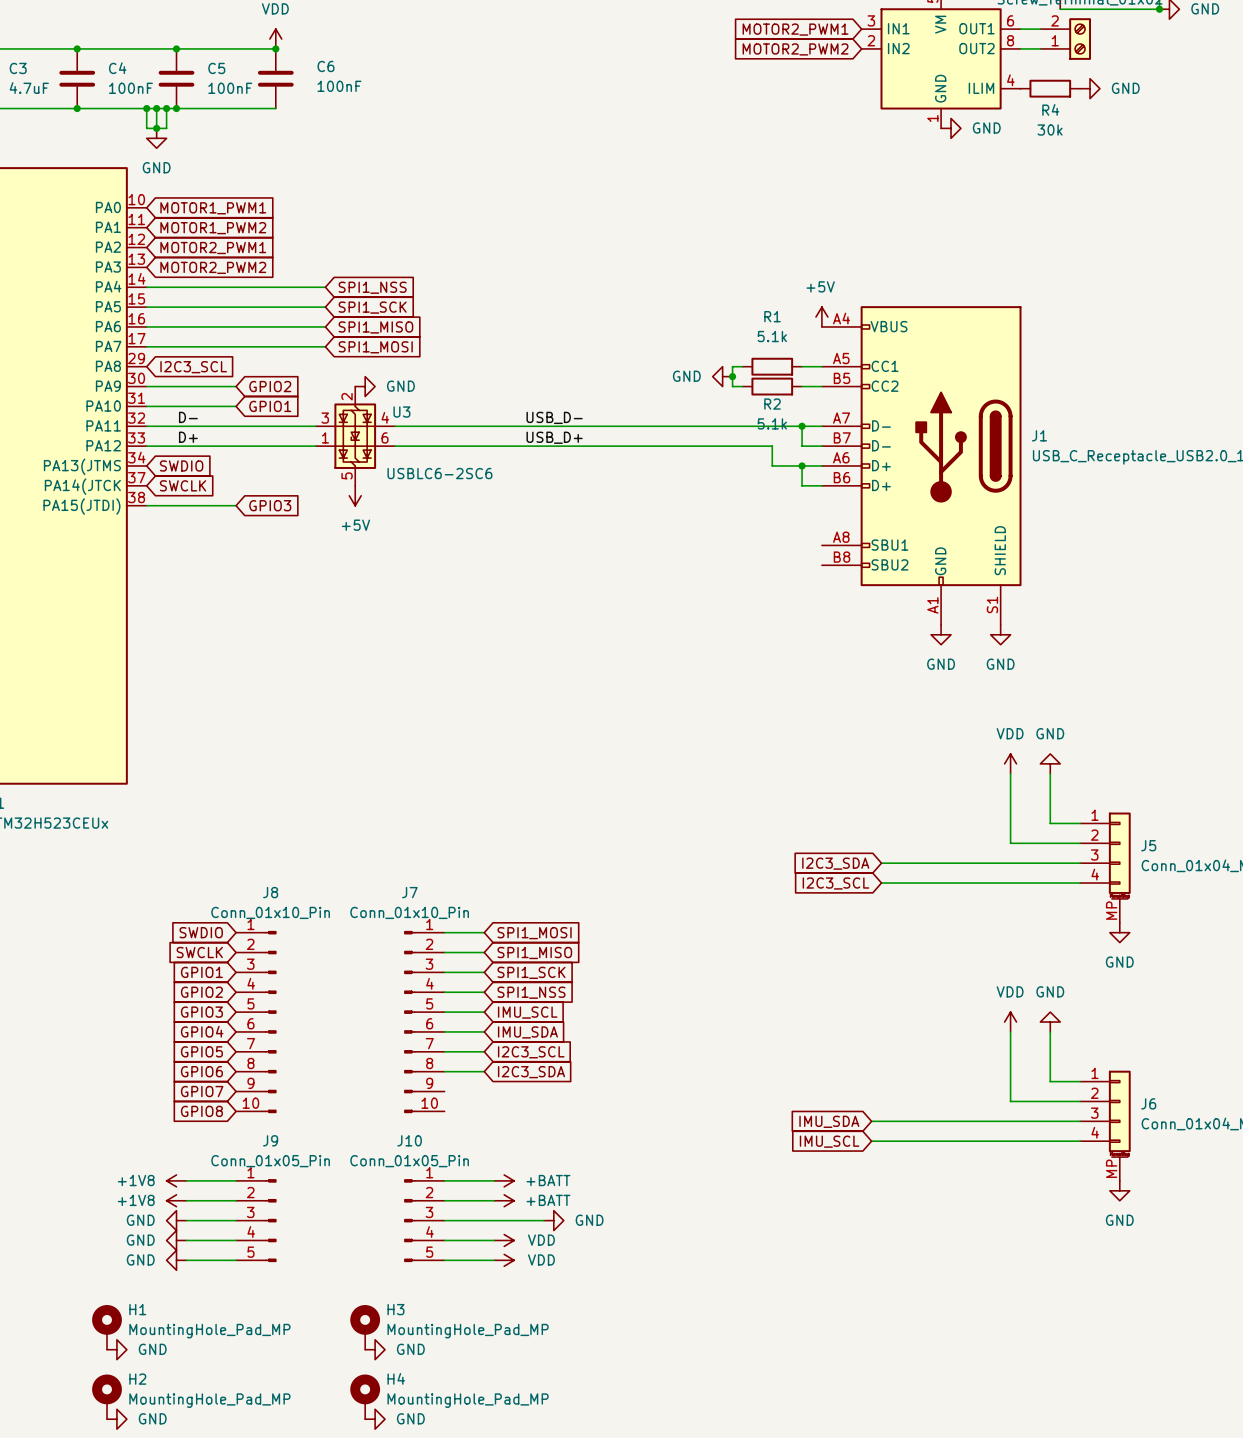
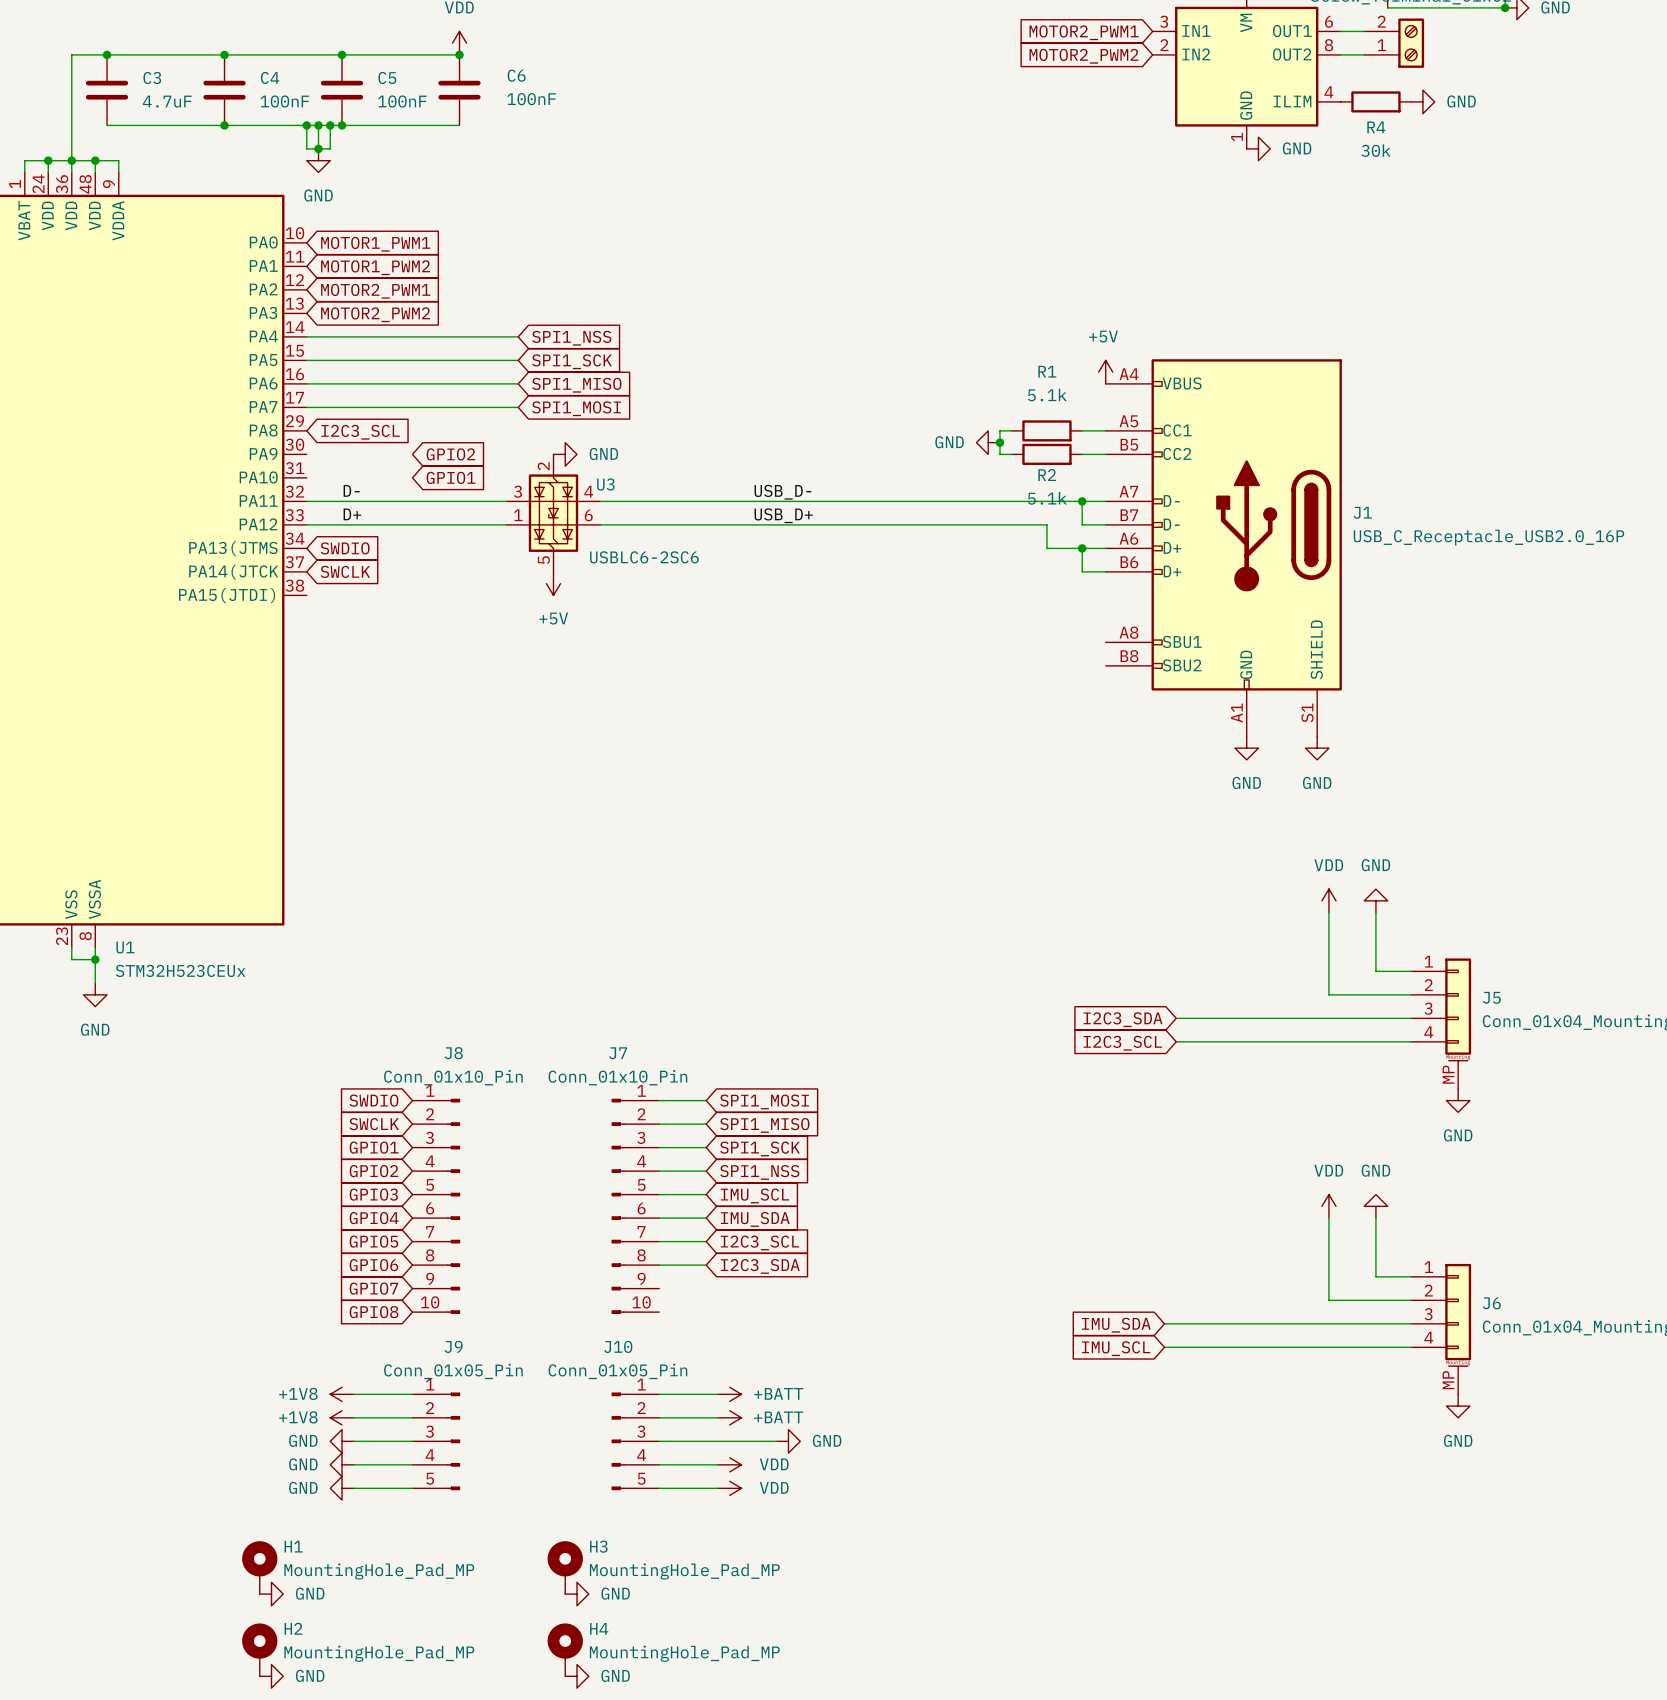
wire: (146, 386) (236, 386) -> none
wire: (146, 406) (236, 406) -> none
wire: (146, 505) (236, 505) -> none
global label: GPIO3 (270, 505) -> none

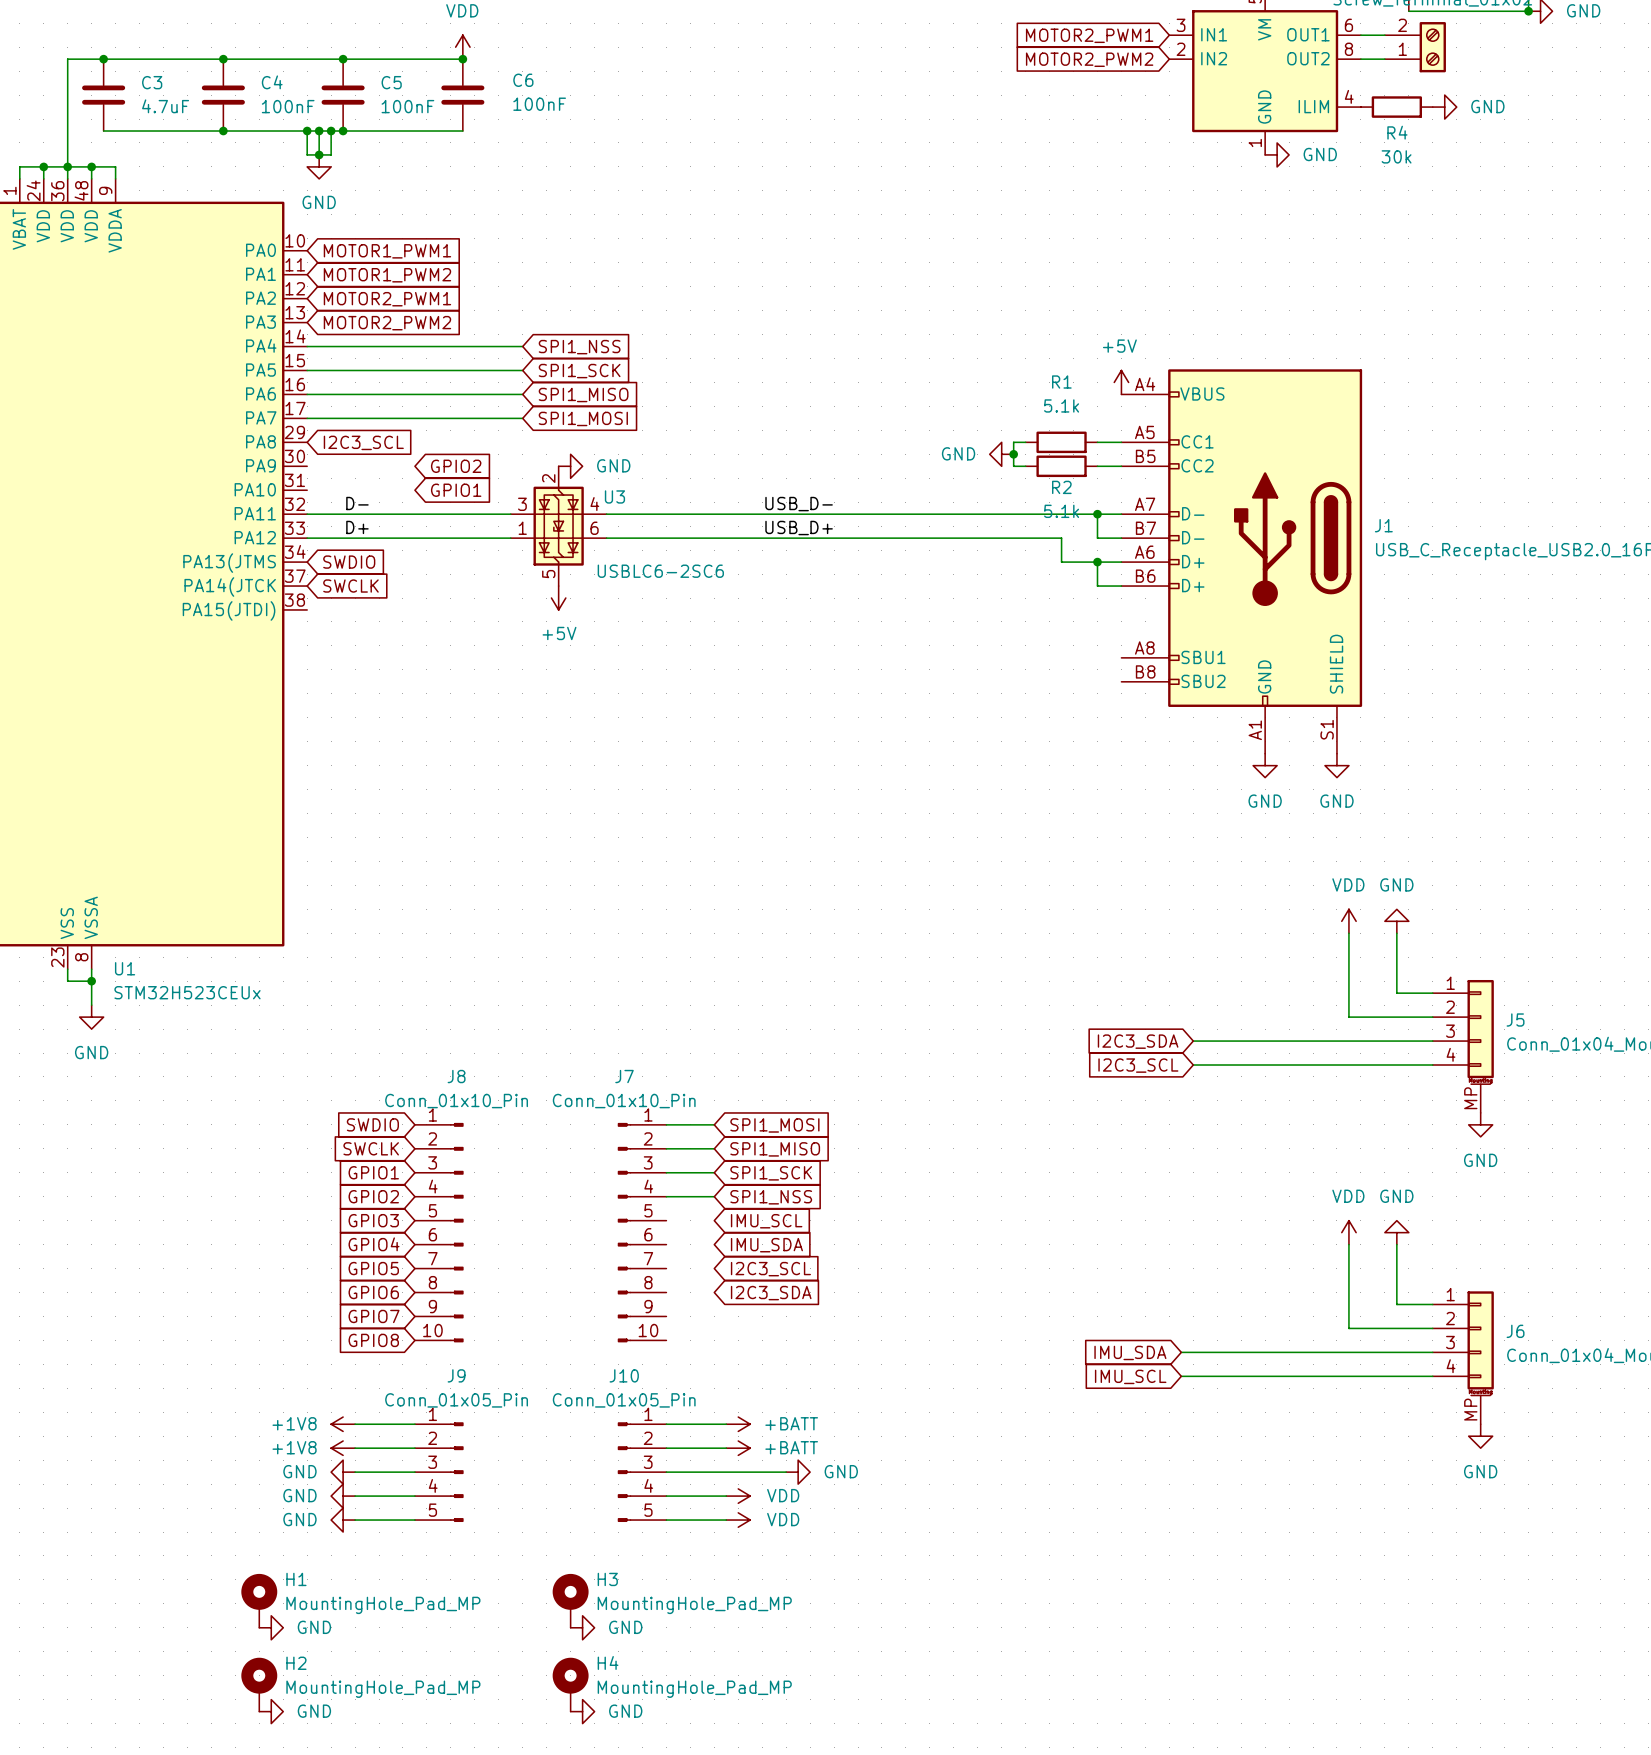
wire: (659, 1194) (706, 1194) -> none
wire: (659, 1218) (706, 1218) -> none
wire: (659, 1241) (706, 1241) -> none
wire: (659, 1265) (706, 1265) -> none

